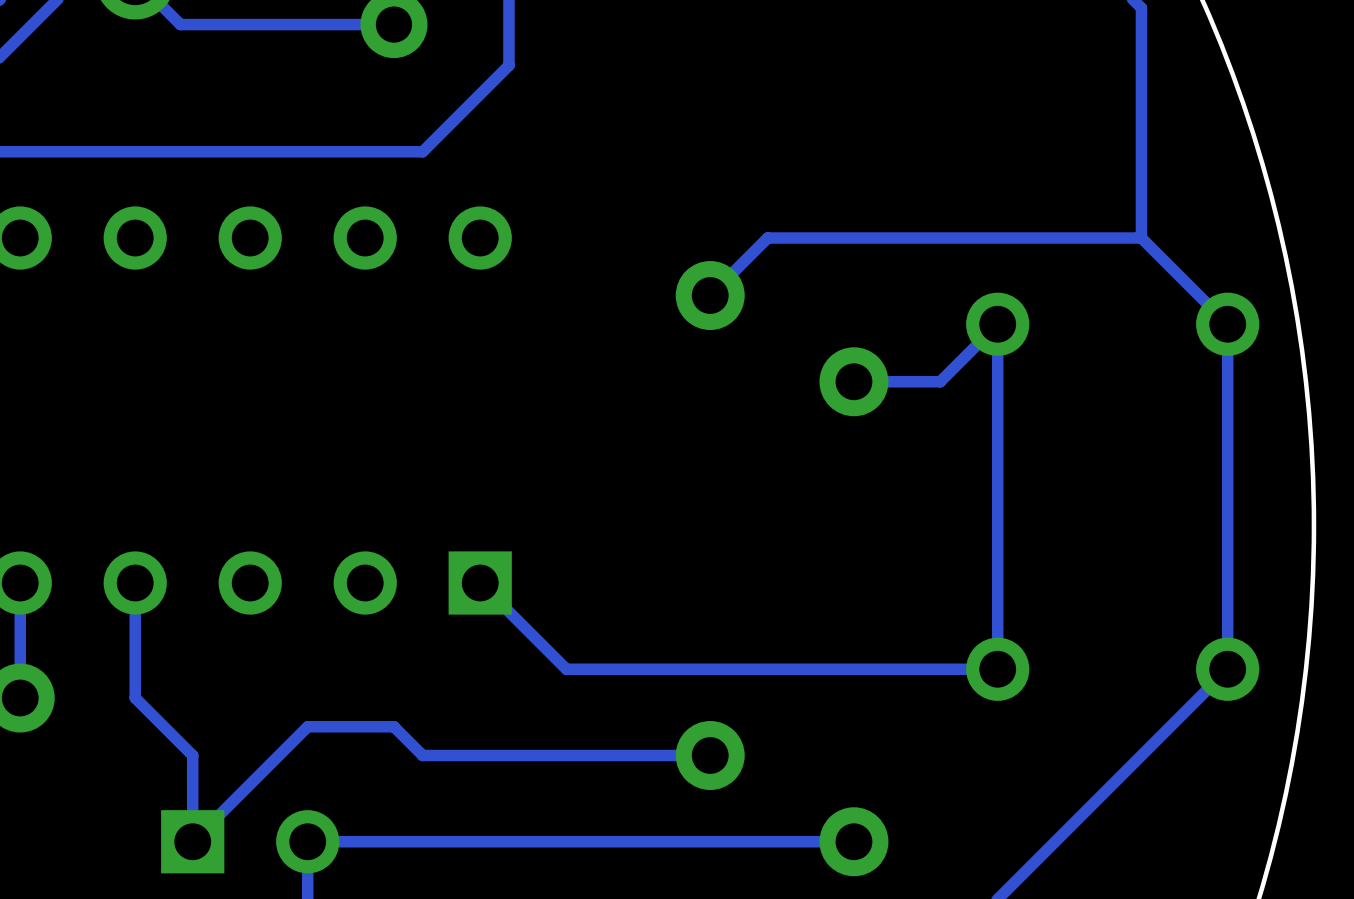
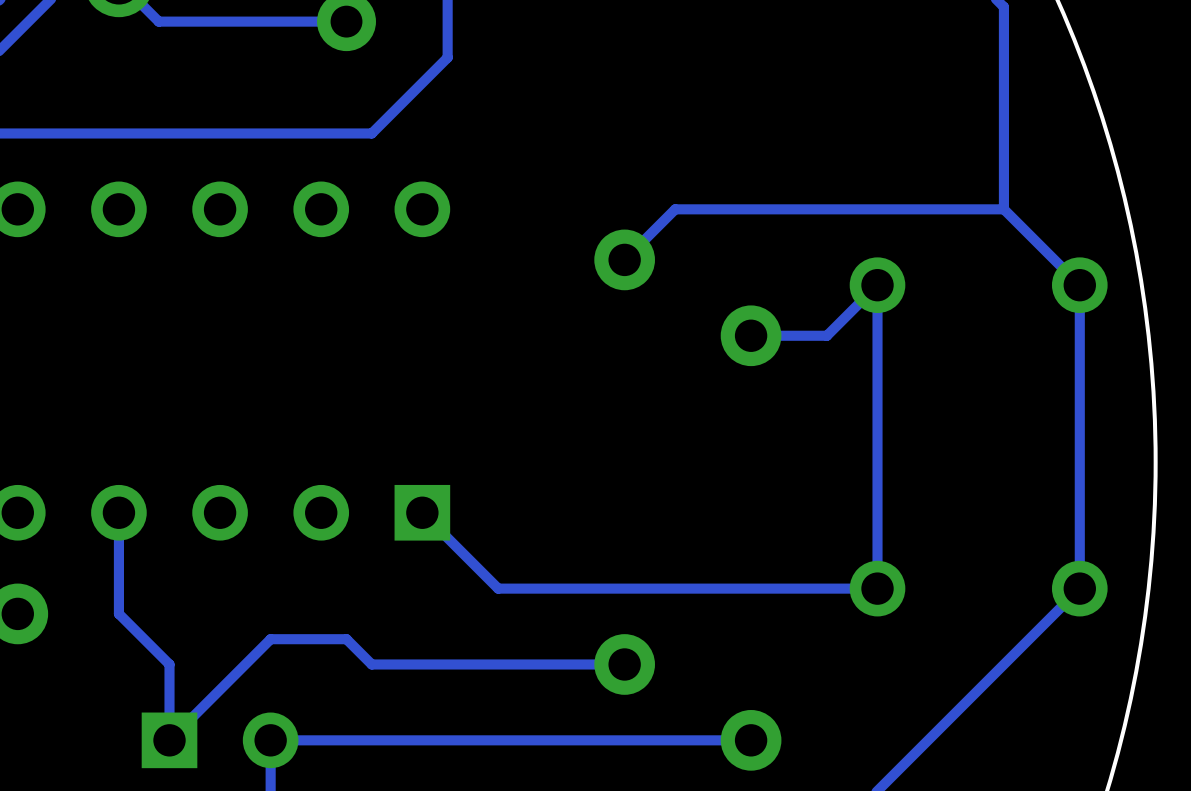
track: (20, 583) (20, 698) -> none

